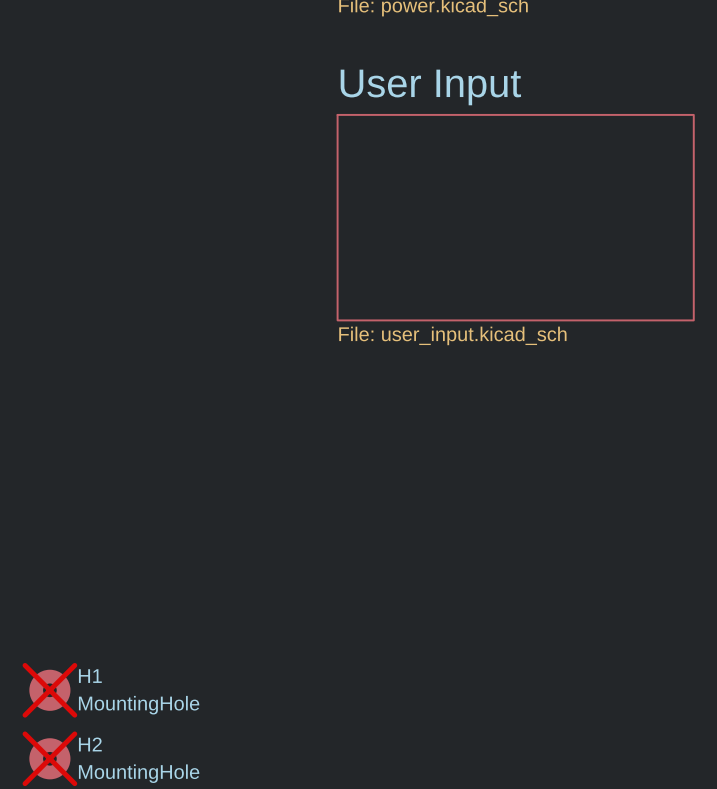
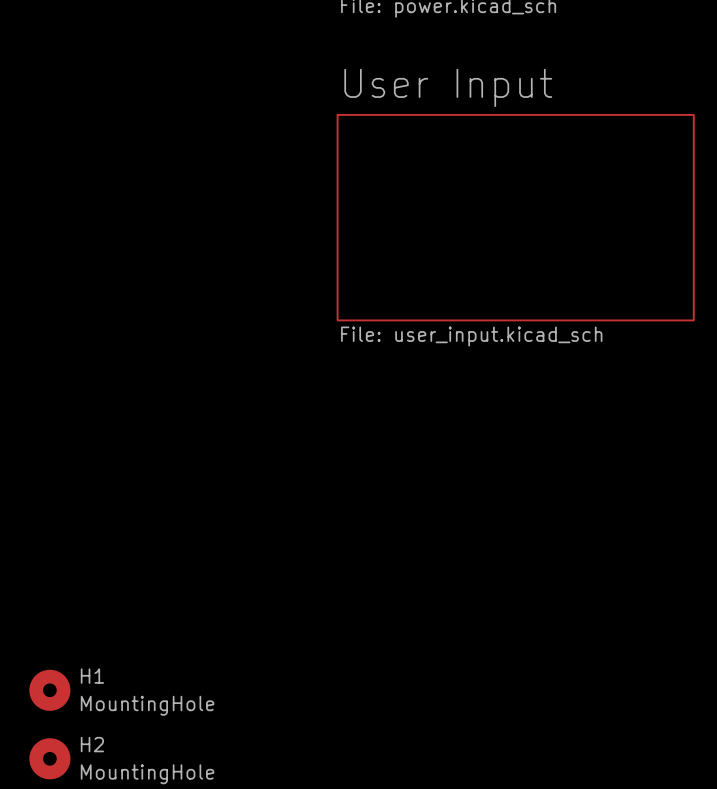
H1 do-not-place cross: (49, 690) -> none
H2 do-not-place cross: (49, 758) -> none

